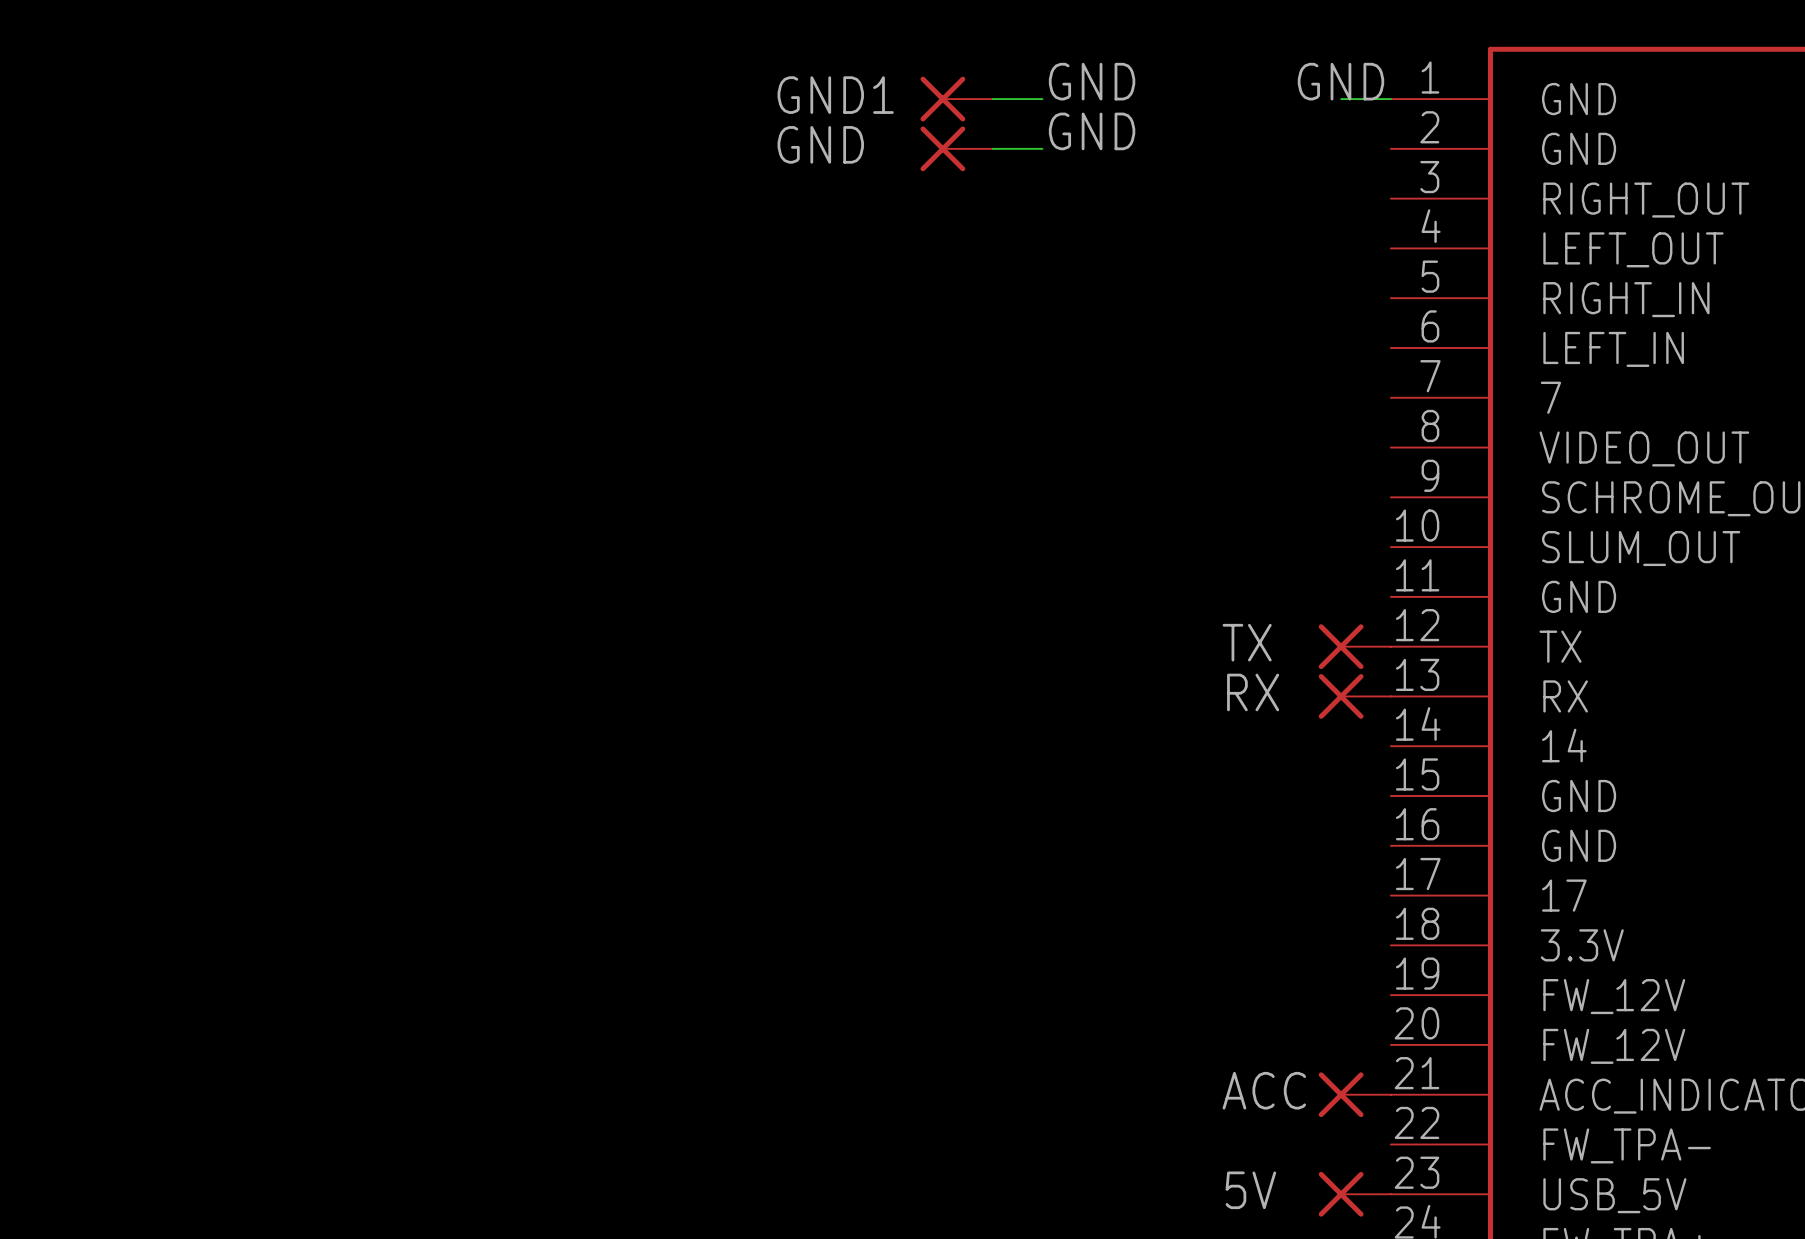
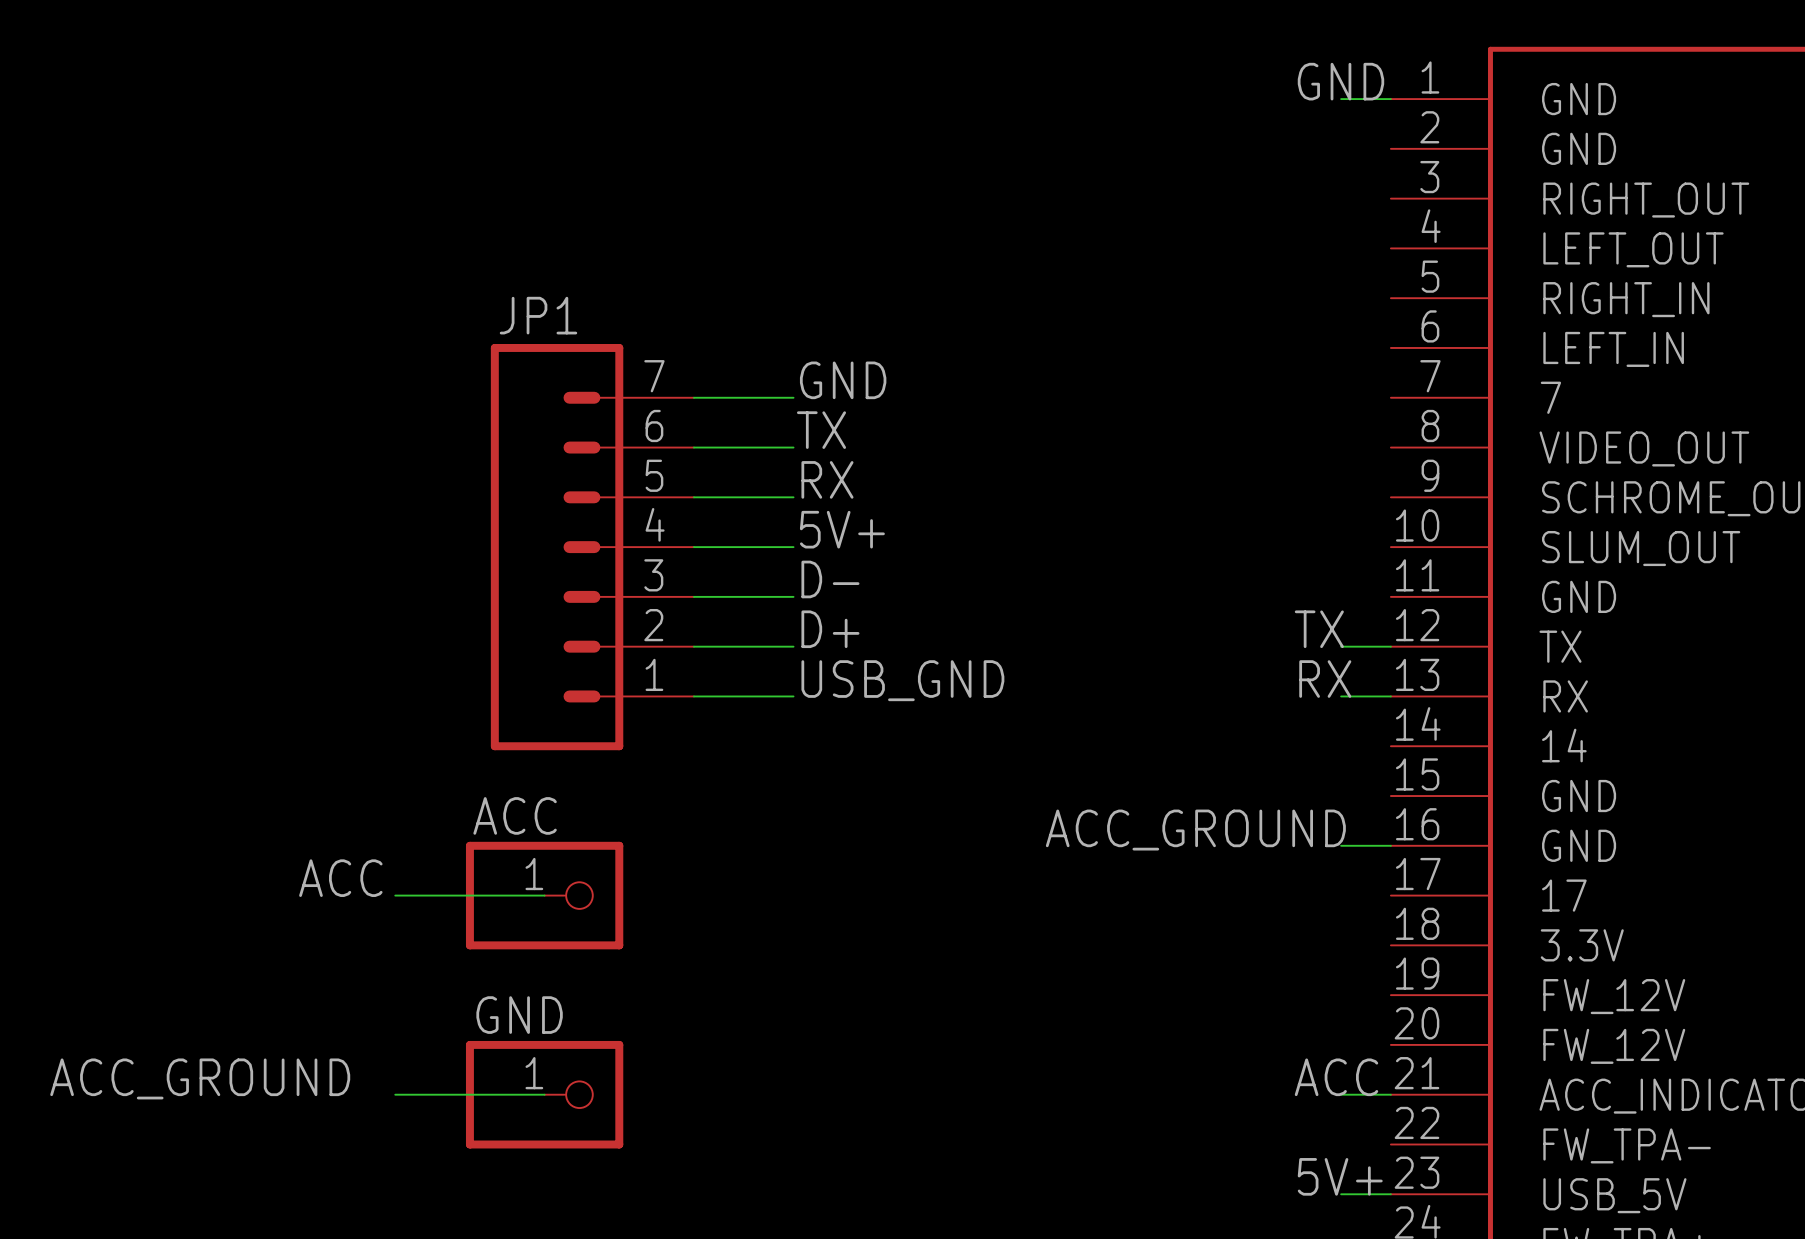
label: GND (1092, 81) -> none
GND1: (956, 99) -> none
wire: (992, 99) (1042, 99) -> none
label: GND (1092, 131) -> none
GND: (956, 148) -> none
wire: (992, 148) (1042, 148) -> none
label: none -> GND (843, 380)
wire: none -> (693, 397) (793, 397)
label: none -> TX (821, 430)
wire: none -> (693, 447) (793, 447)
label: none -> RX (827, 479)
wire: none -> (693, 497) (793, 497)
label: none -> 5V+ (842, 529)
JP1: none -> (592, 547)
wire: none -> (693, 547) (793, 547)
label: none -> D- (830, 579)
wire: none -> (693, 596) (793, 596)
label: none -> D+ (830, 629)
label: none -> TX (1319, 629)
wire: none -> (693, 646) (793, 646)
TX: (1354, 646) -> none
label: none -> RX (1325, 679)
label: none -> USB_GND (902, 680)
wire: none -> (693, 696) (793, 696)
RX: (1354, 696) -> none
label: none -> ACC_GROUND (1195, 830)
wire: none -> (1341, 845) (1390, 845)
label: none -> ACC (340, 878)
wire: none -> (395, 895) (544, 895)
ACC: none -> (544, 895)
label: none -> ACC (1336, 1077)
label: none -> ACC_GROUND (200, 1078)
wire: none -> (395, 1094) (544, 1094)
GND: none -> (544, 1094)
ACC: (1354, 1094) -> none
label: none -> 5V+ (1340, 1176)
5V: (1354, 1194) -> none

